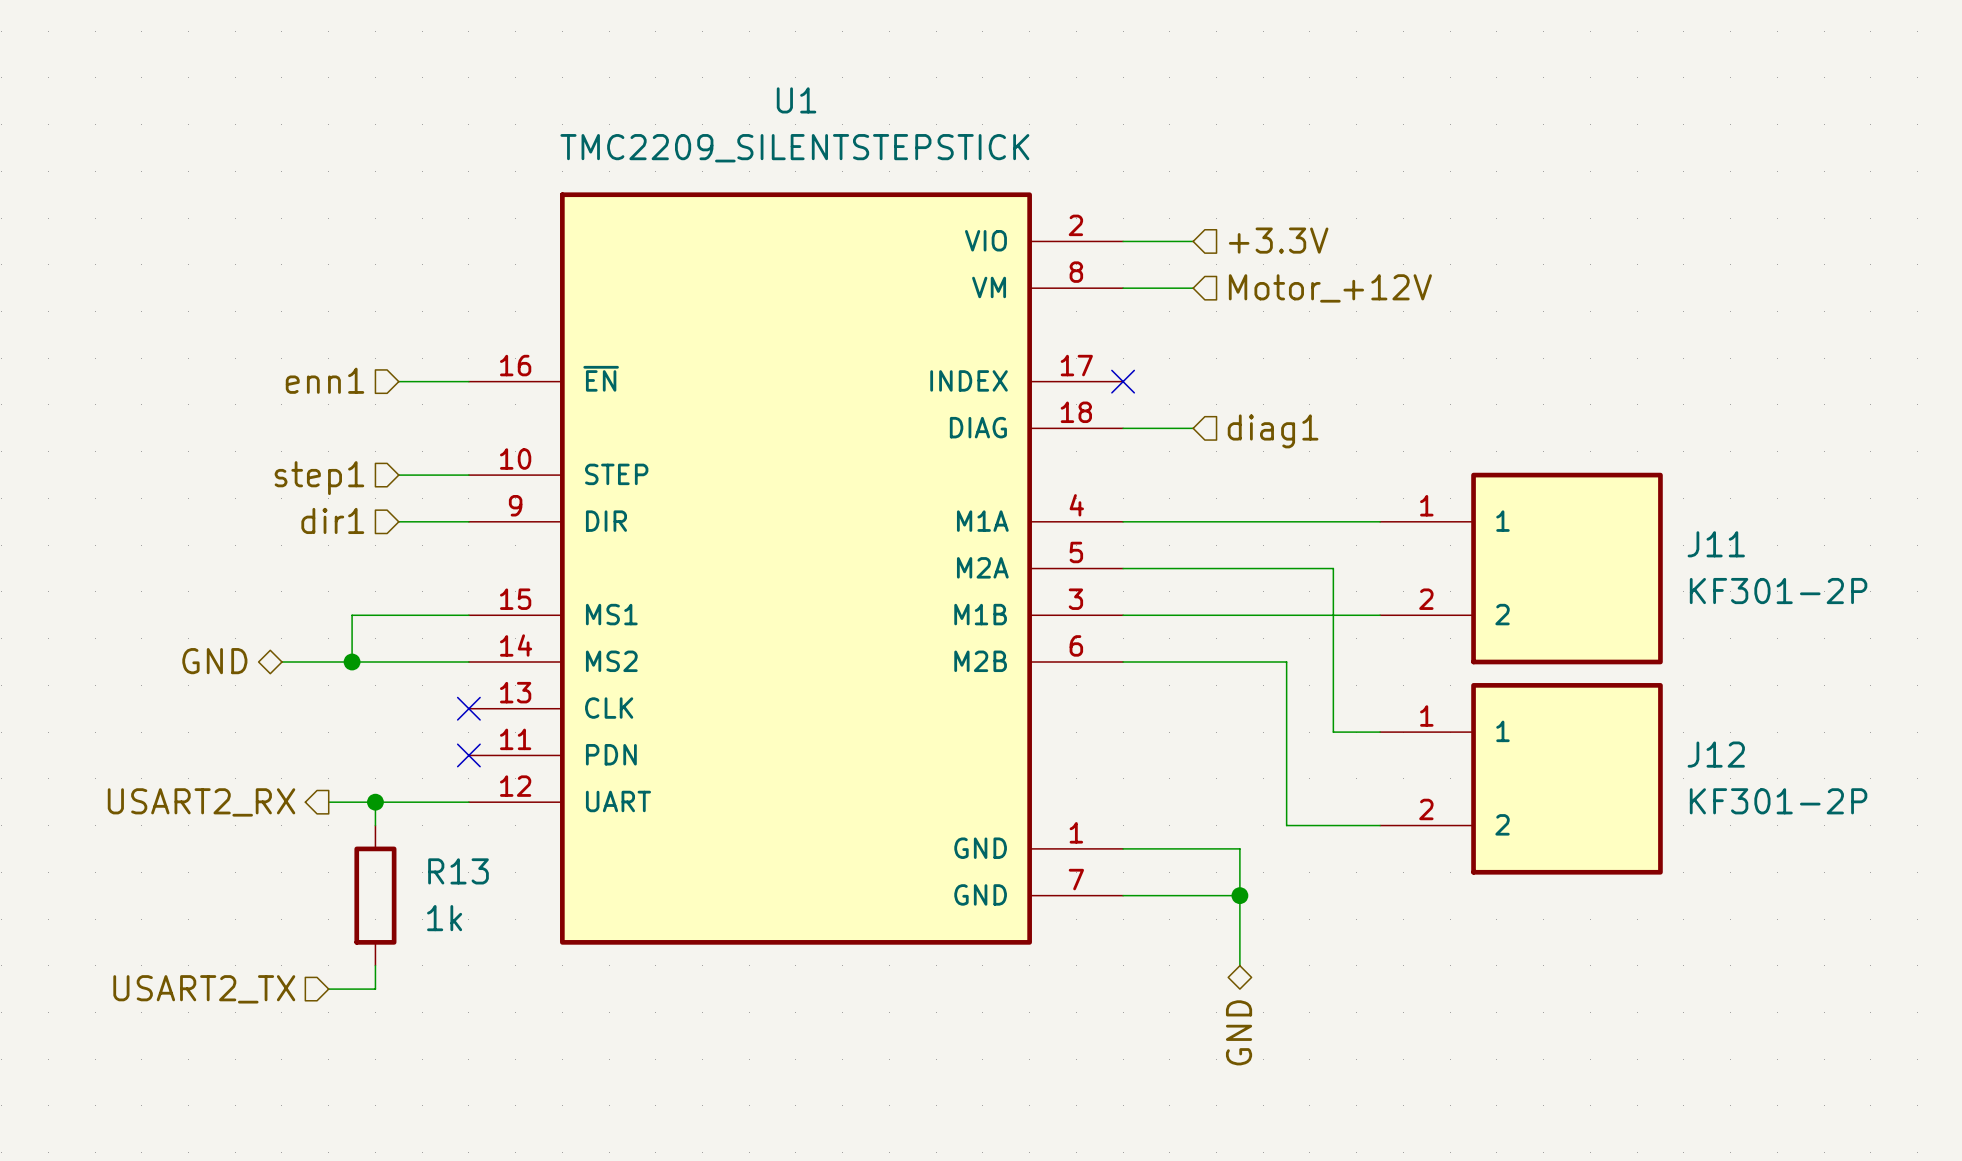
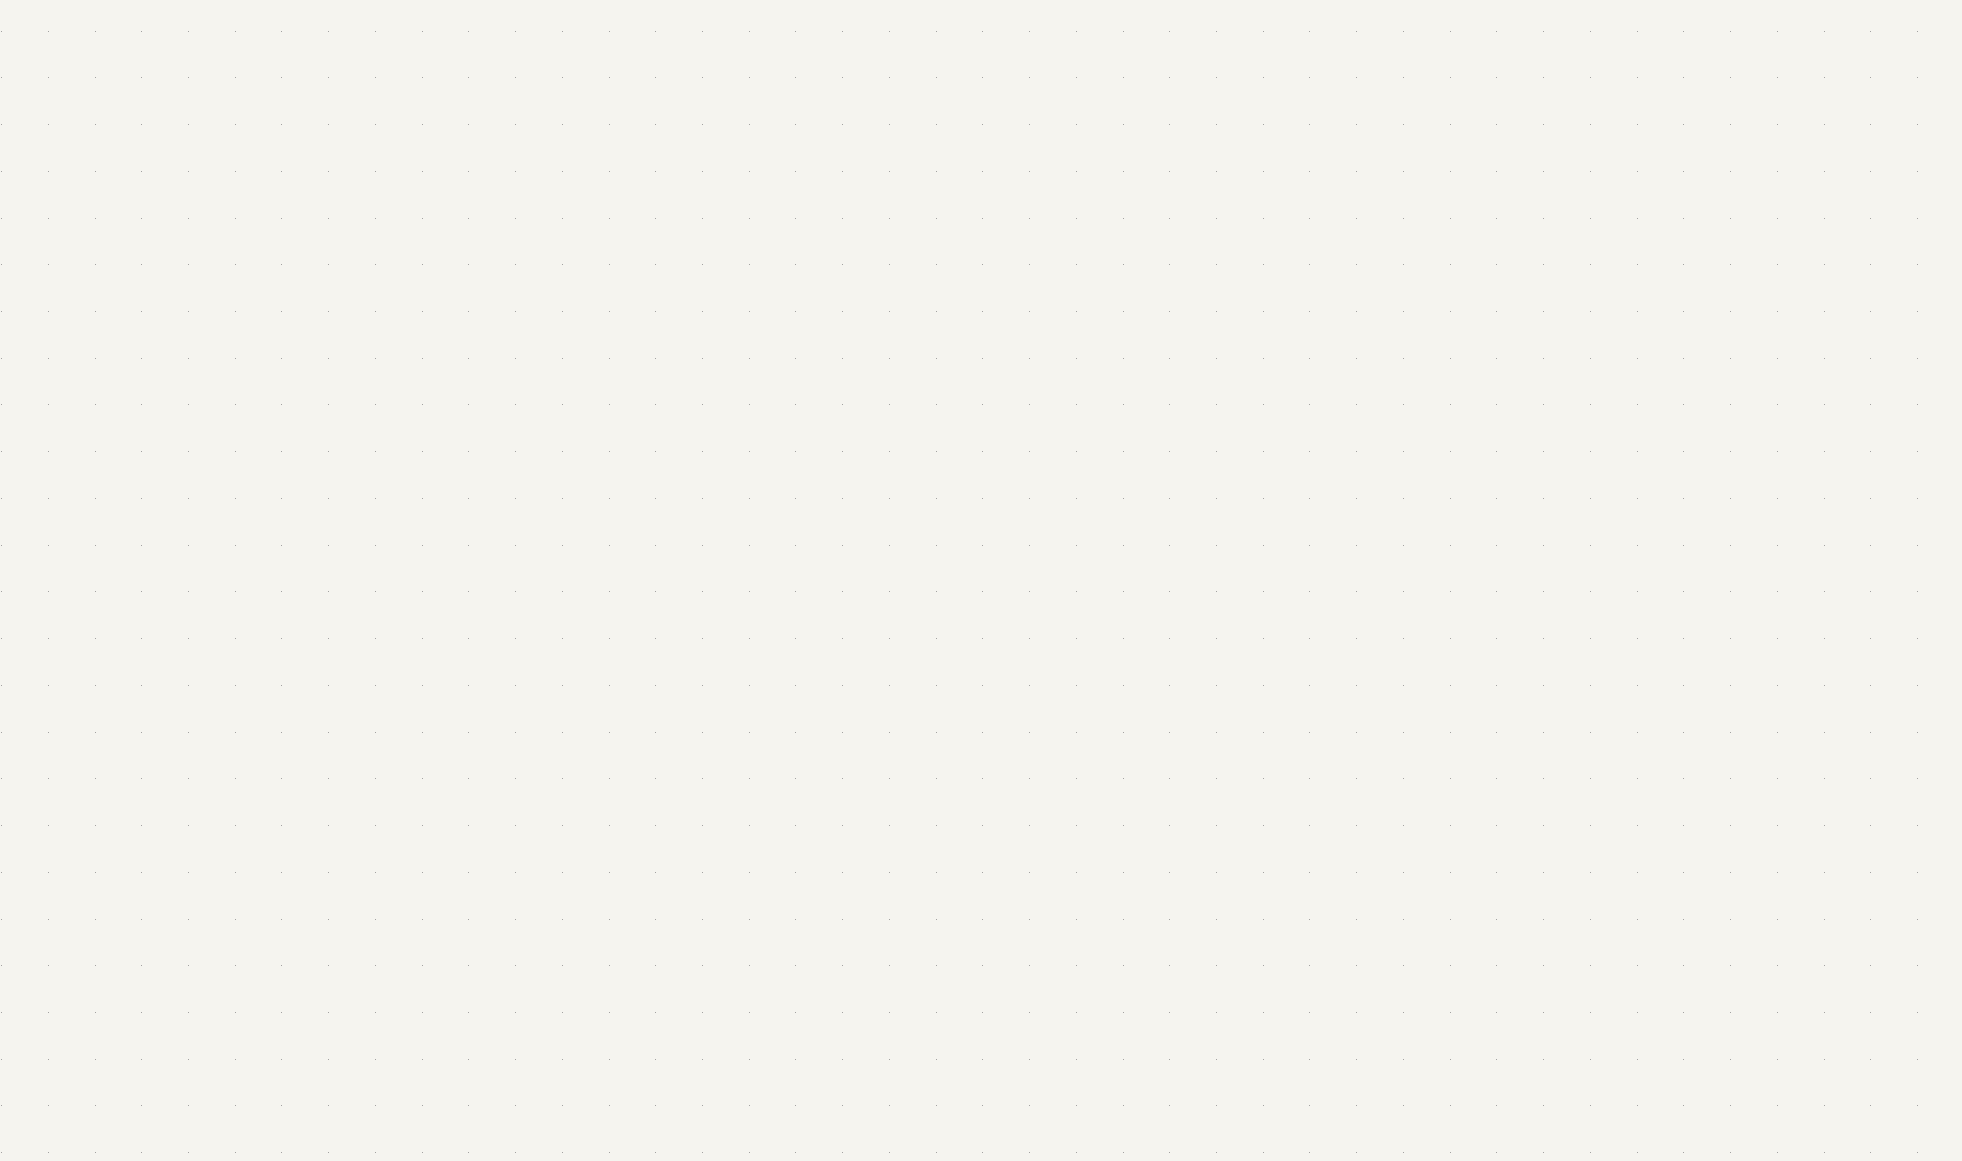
hierarchical label: +3.3V (1278, 240) -> none
wire: (1123, 241) (1193, 241) -> none
wire: (1123, 288) (1193, 288) -> none
hierarchical label: Motor_+12V (1330, 288) -> none
hierarchical label: enn1 (325, 380) -> none
wire: (398, 381) (468, 381) -> none
no-connect mark: (1123, 381) -> none
wire: (1123, 428) (1193, 428) -> none
hierarchical label: diag1 (1273, 431) -> none
wire: (398, 475) (468, 475) -> none
hierarchical label: step1 (319, 478) -> none
hierarchical label: dir1 (332, 520) -> none
wire: (398, 521) (468, 521) -> none
wire: (1123, 521) (1380, 521) -> none
U1: TMC2209_SILENTSTEPSTICK (795, 568) -> none
wire: (1123, 568) (1333, 568) (1333, 732) (1380, 732) -> none
J11: KF301-2P (1521, 568) -> none
wire: (468, 615) (352, 615) (352, 662) -> none
wire: (1123, 615) (1380, 615) -> none
hierarchical label: GND (214, 661) -> none
wire: (281, 662) (468, 662) -> none
junction: (352, 662) -> none
wire: (1123, 662) (1286, 662) (1286, 825) (1380, 825) -> none
no-connect mark: (468, 708) -> none
no-connect mark: (468, 755) -> none
J12: KF301-2P (1521, 778) -> none
hierarchical label: USART2_RX (201, 802) -> none
wire: (328, 802) (468, 802) -> none
wire: (375, 802) (375, 825) -> none
junction: (375, 802) -> none
wire: (1123, 848) (1239, 848) (1239, 965) -> none
R13: 1k (375, 895) -> none
wire: (1123, 895) (1239, 895) -> none
junction: (1239, 895) -> none
wire: (375, 965) (375, 989) (328, 989) -> none
hierarchical label: USART2_TX (204, 989) -> none
hierarchical label: GND (1239, 1032) -> none

